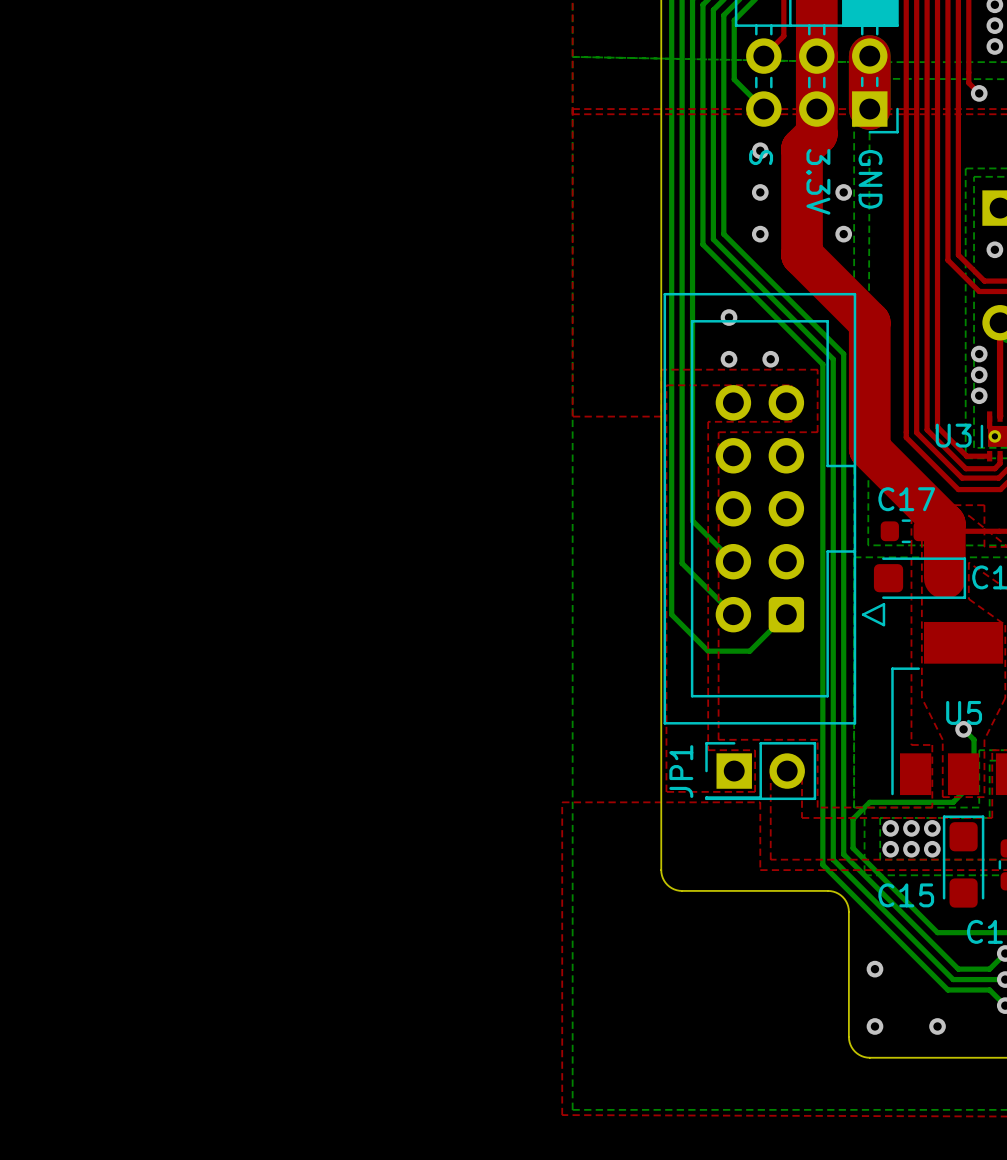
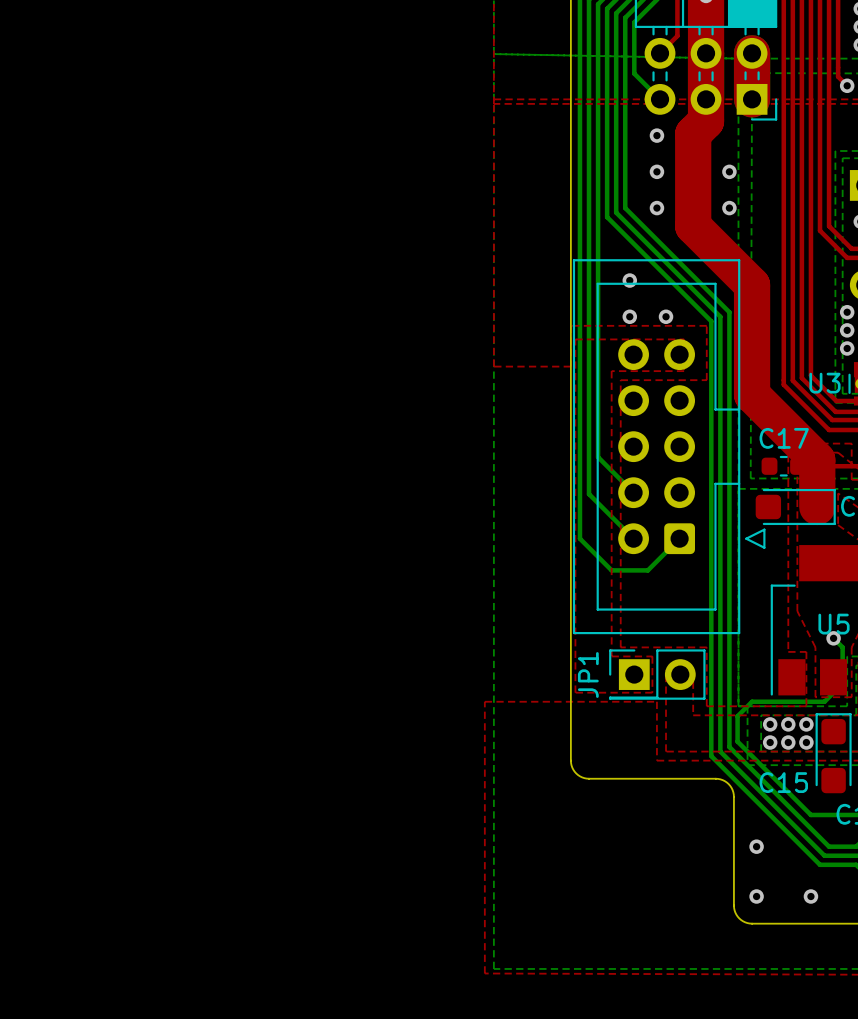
text: S (761, 157) -> none
text: GND (870, 179) -> none
text: 3.3V (818, 181) -> none

